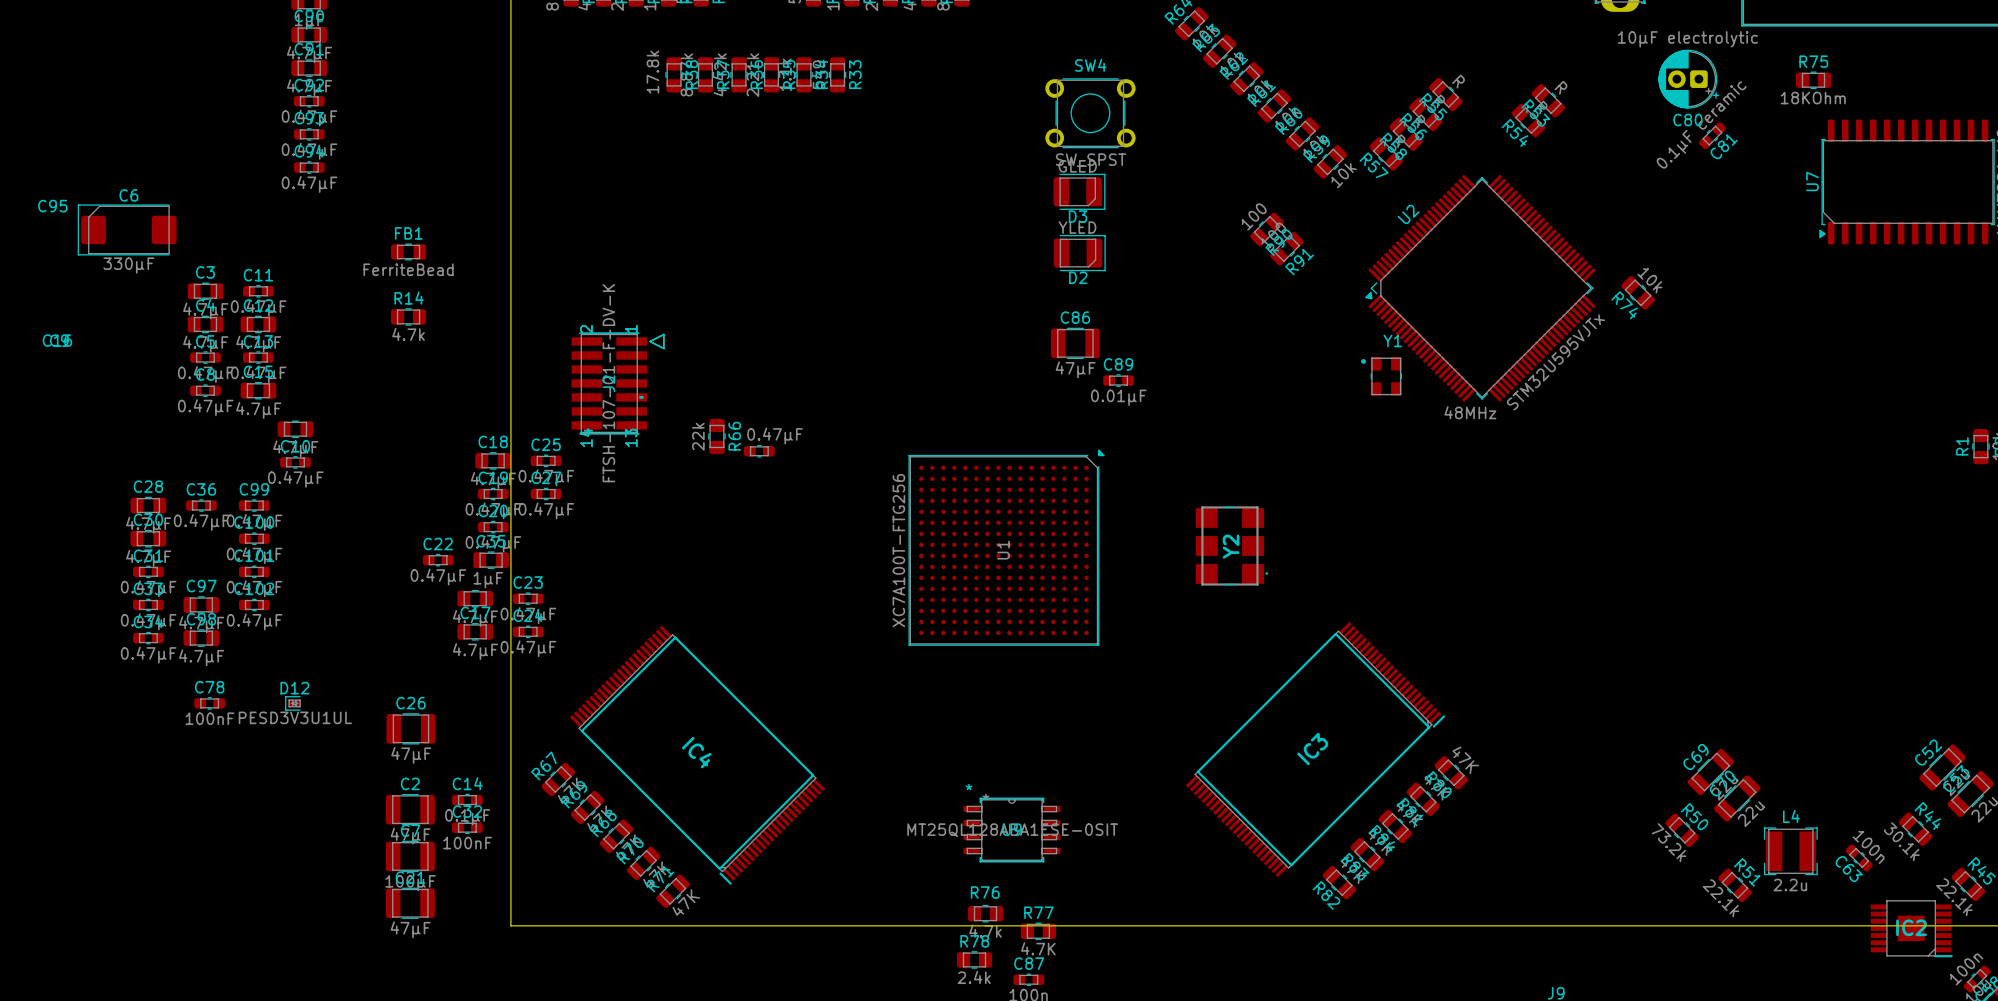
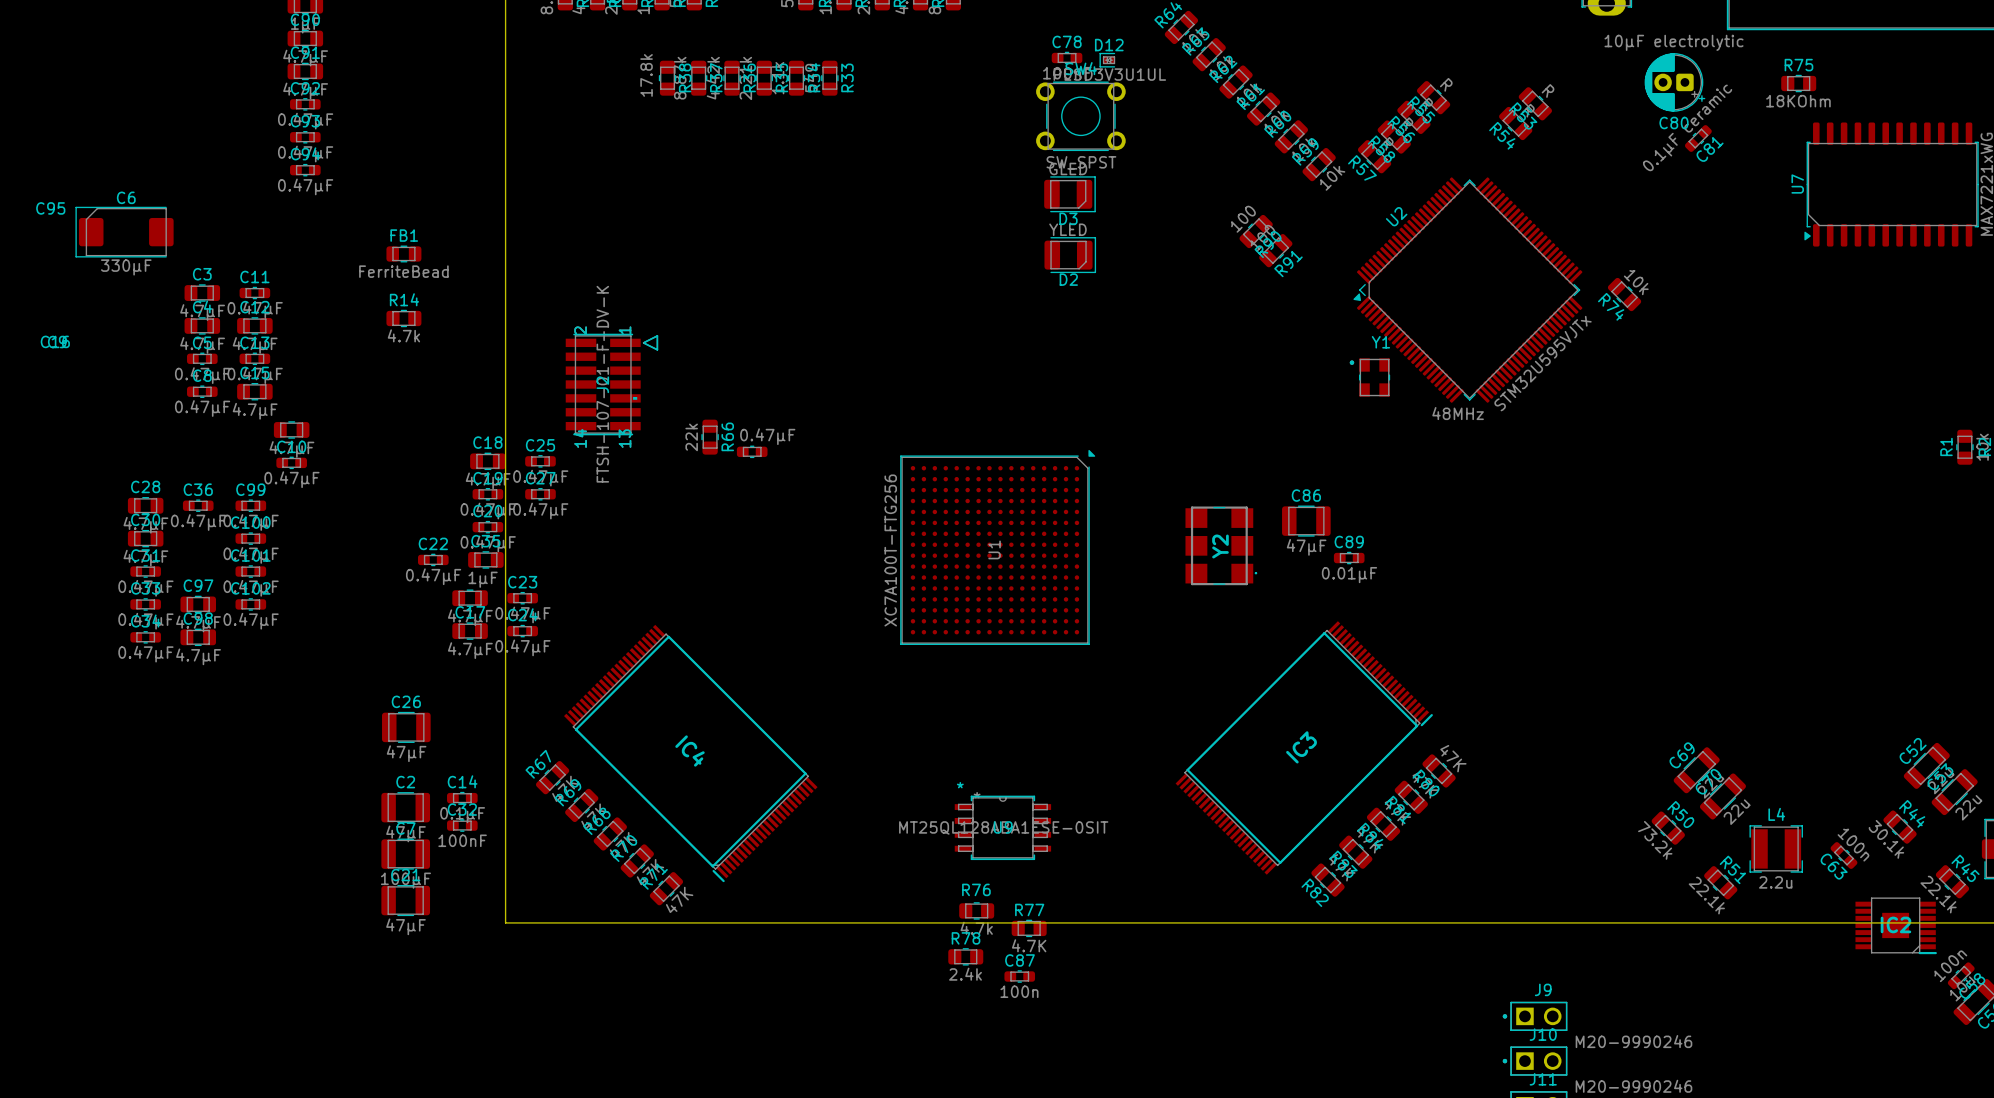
C86 position: (1075, 343) -> (1306, 521)
C89 position: (1118, 380) -> (1349, 558)
C78 position: (209, 703) -> (1067, 57)
D12 position: (292, 703) -> (1107, 60)

